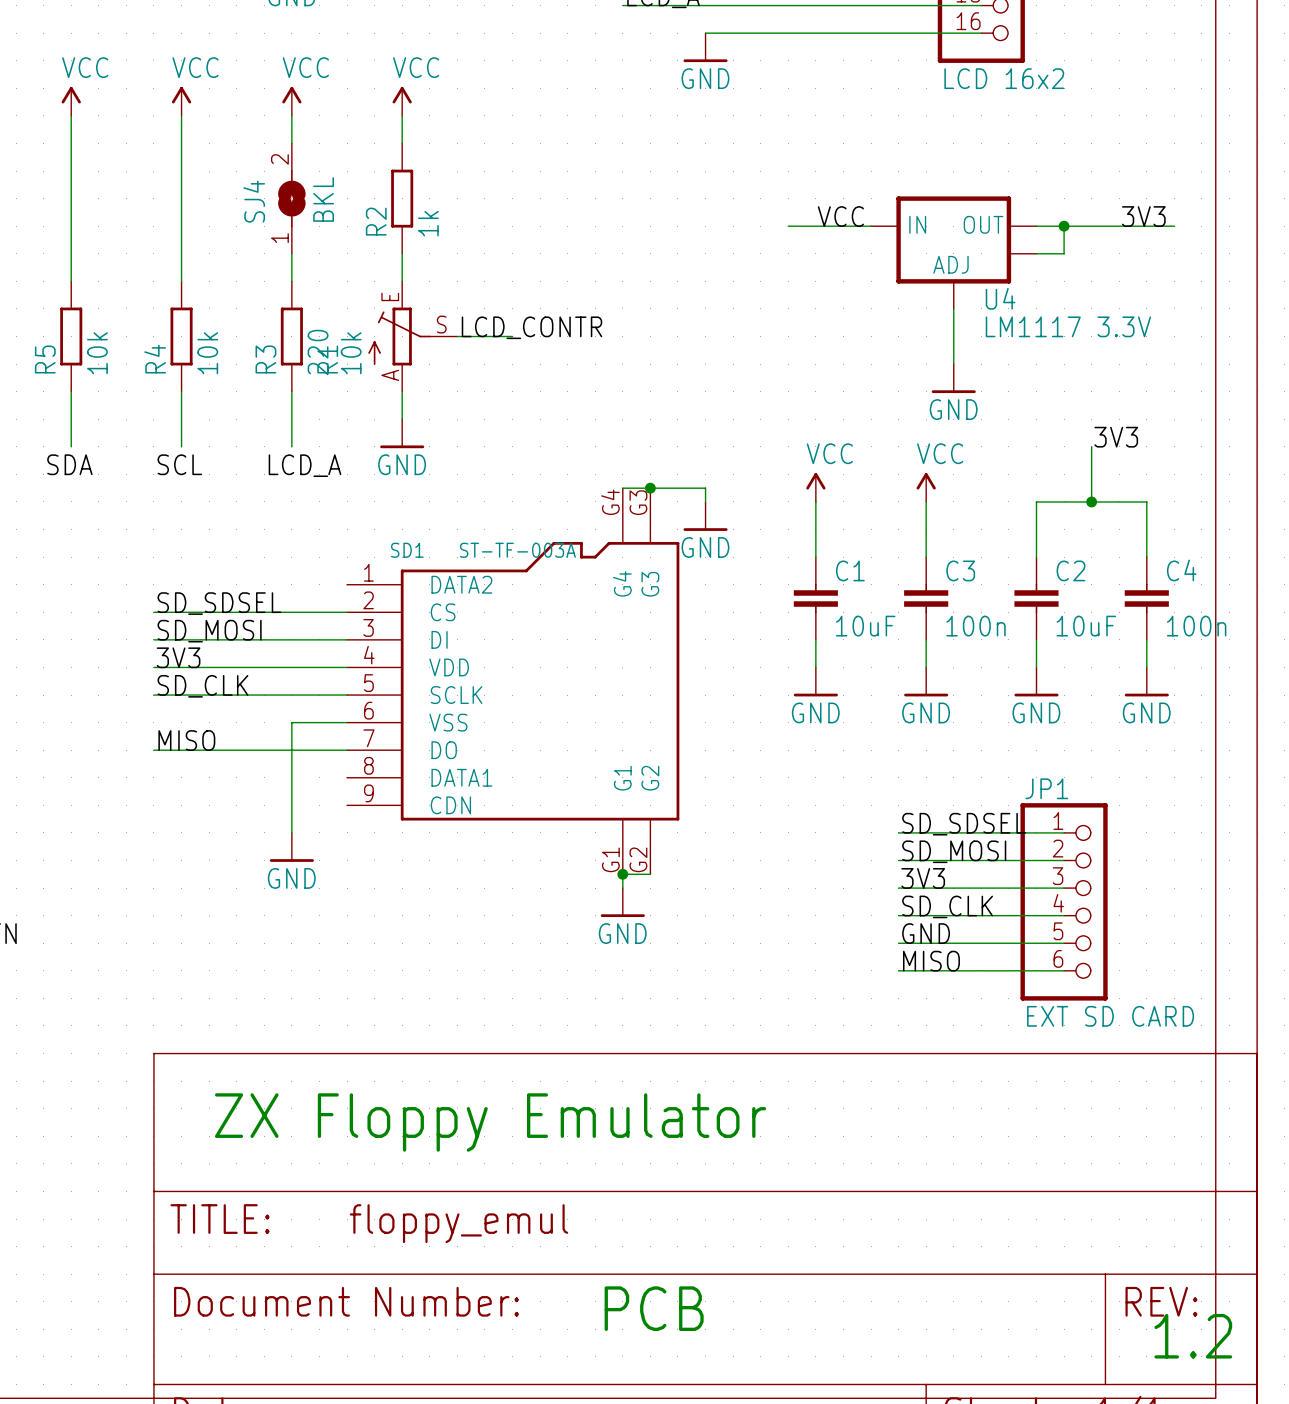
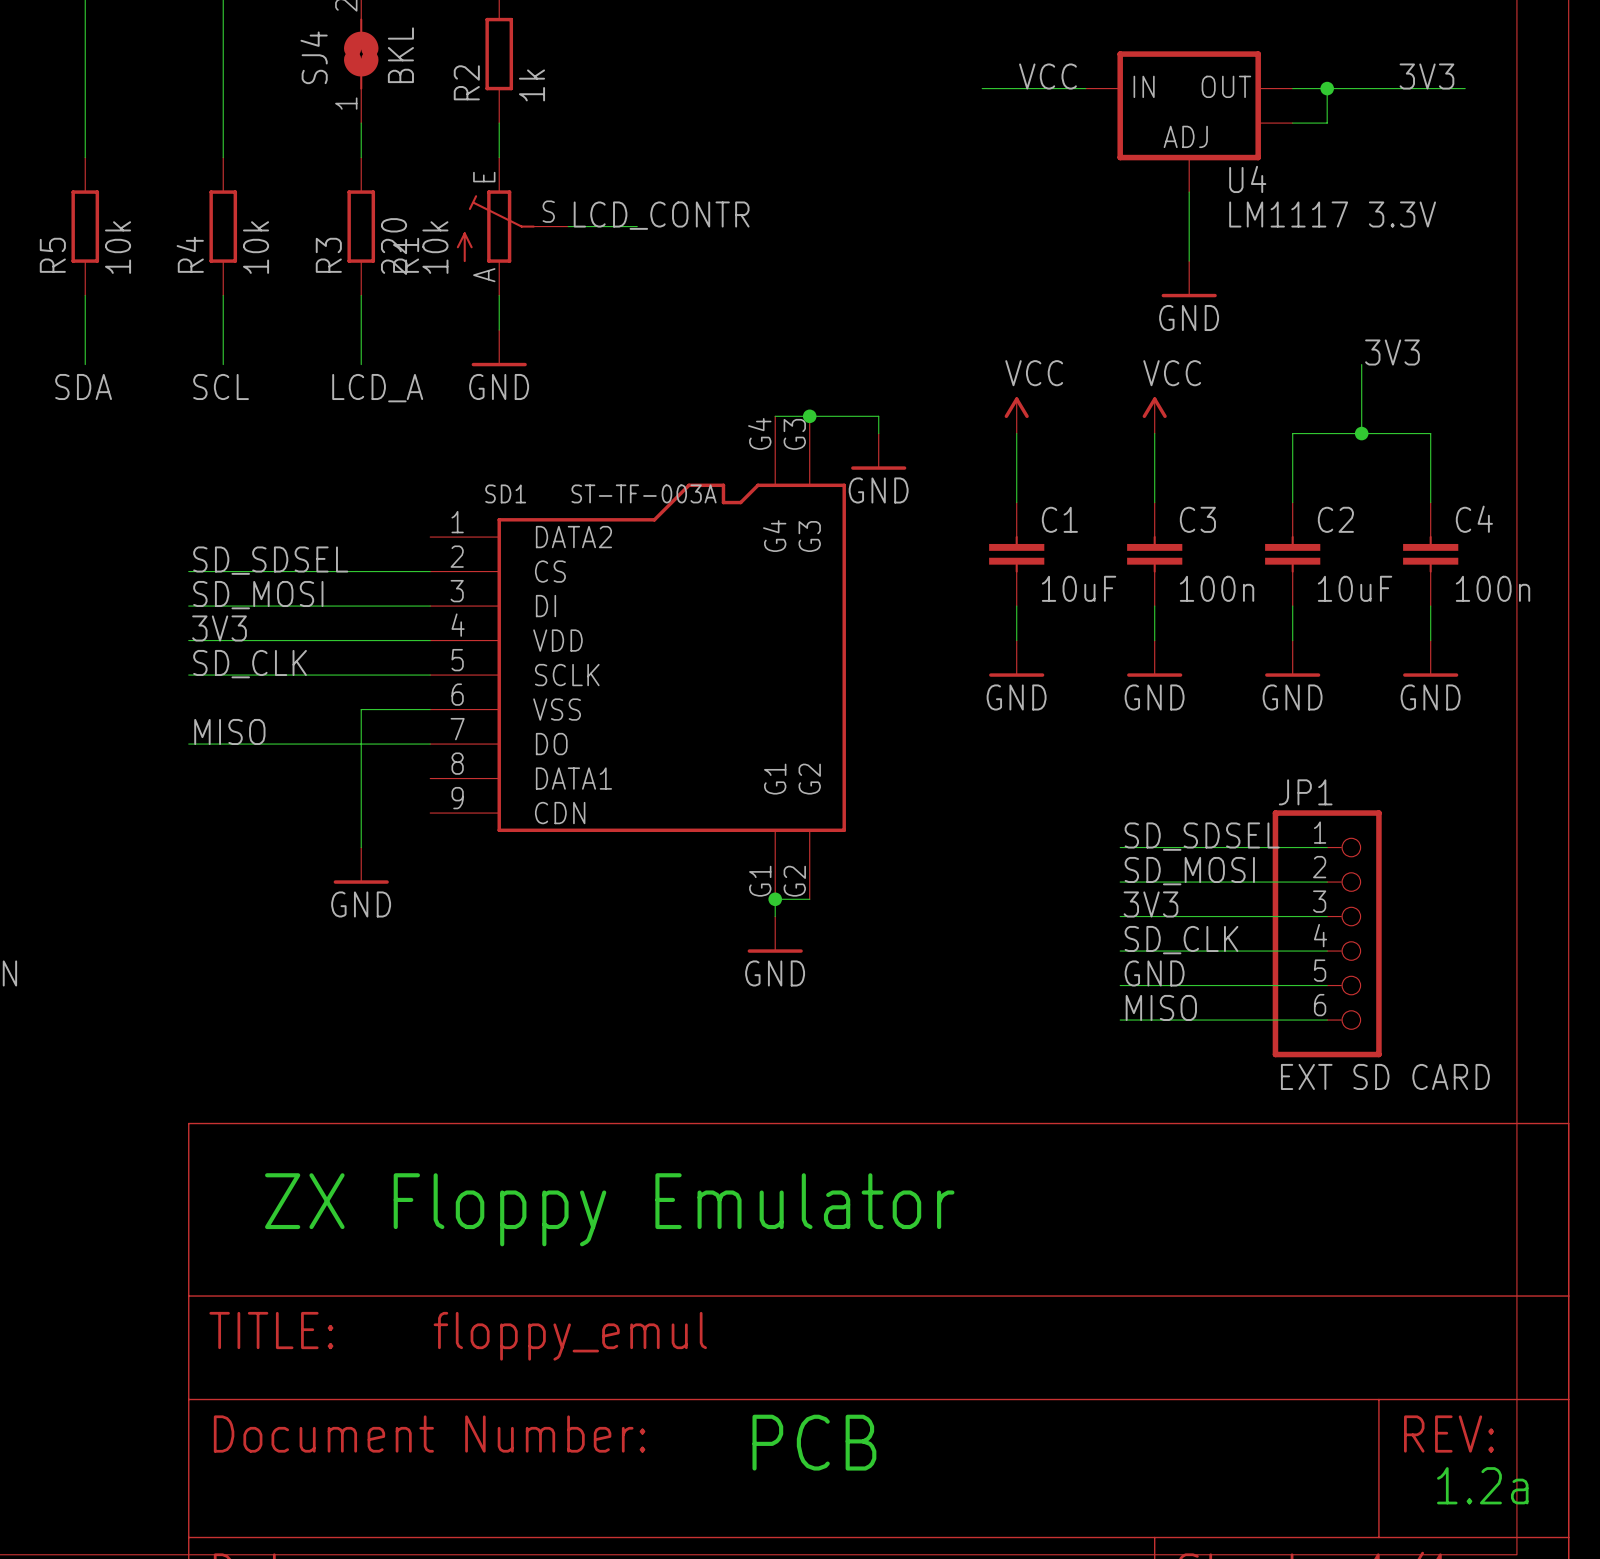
text: 1.2 (1193, 1336) -> 1.2a (1482, 1485)

